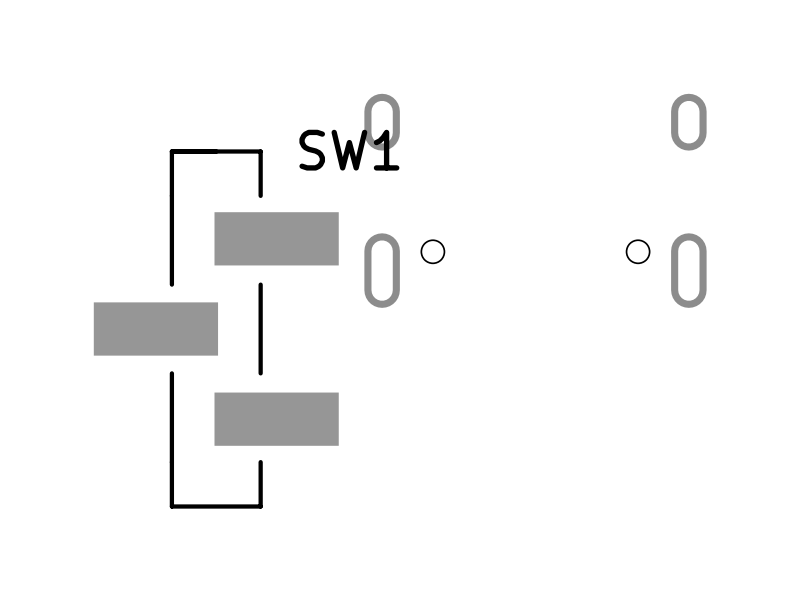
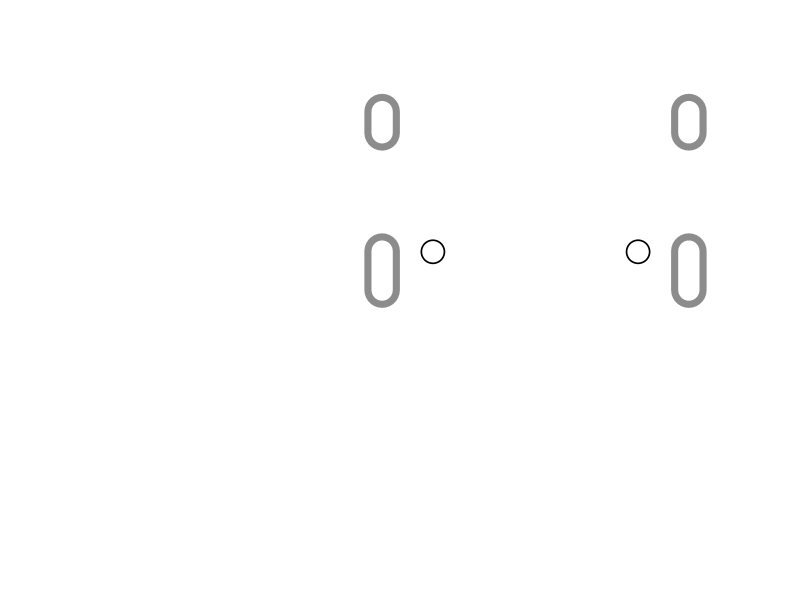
SW1: (216, 329) -> none

